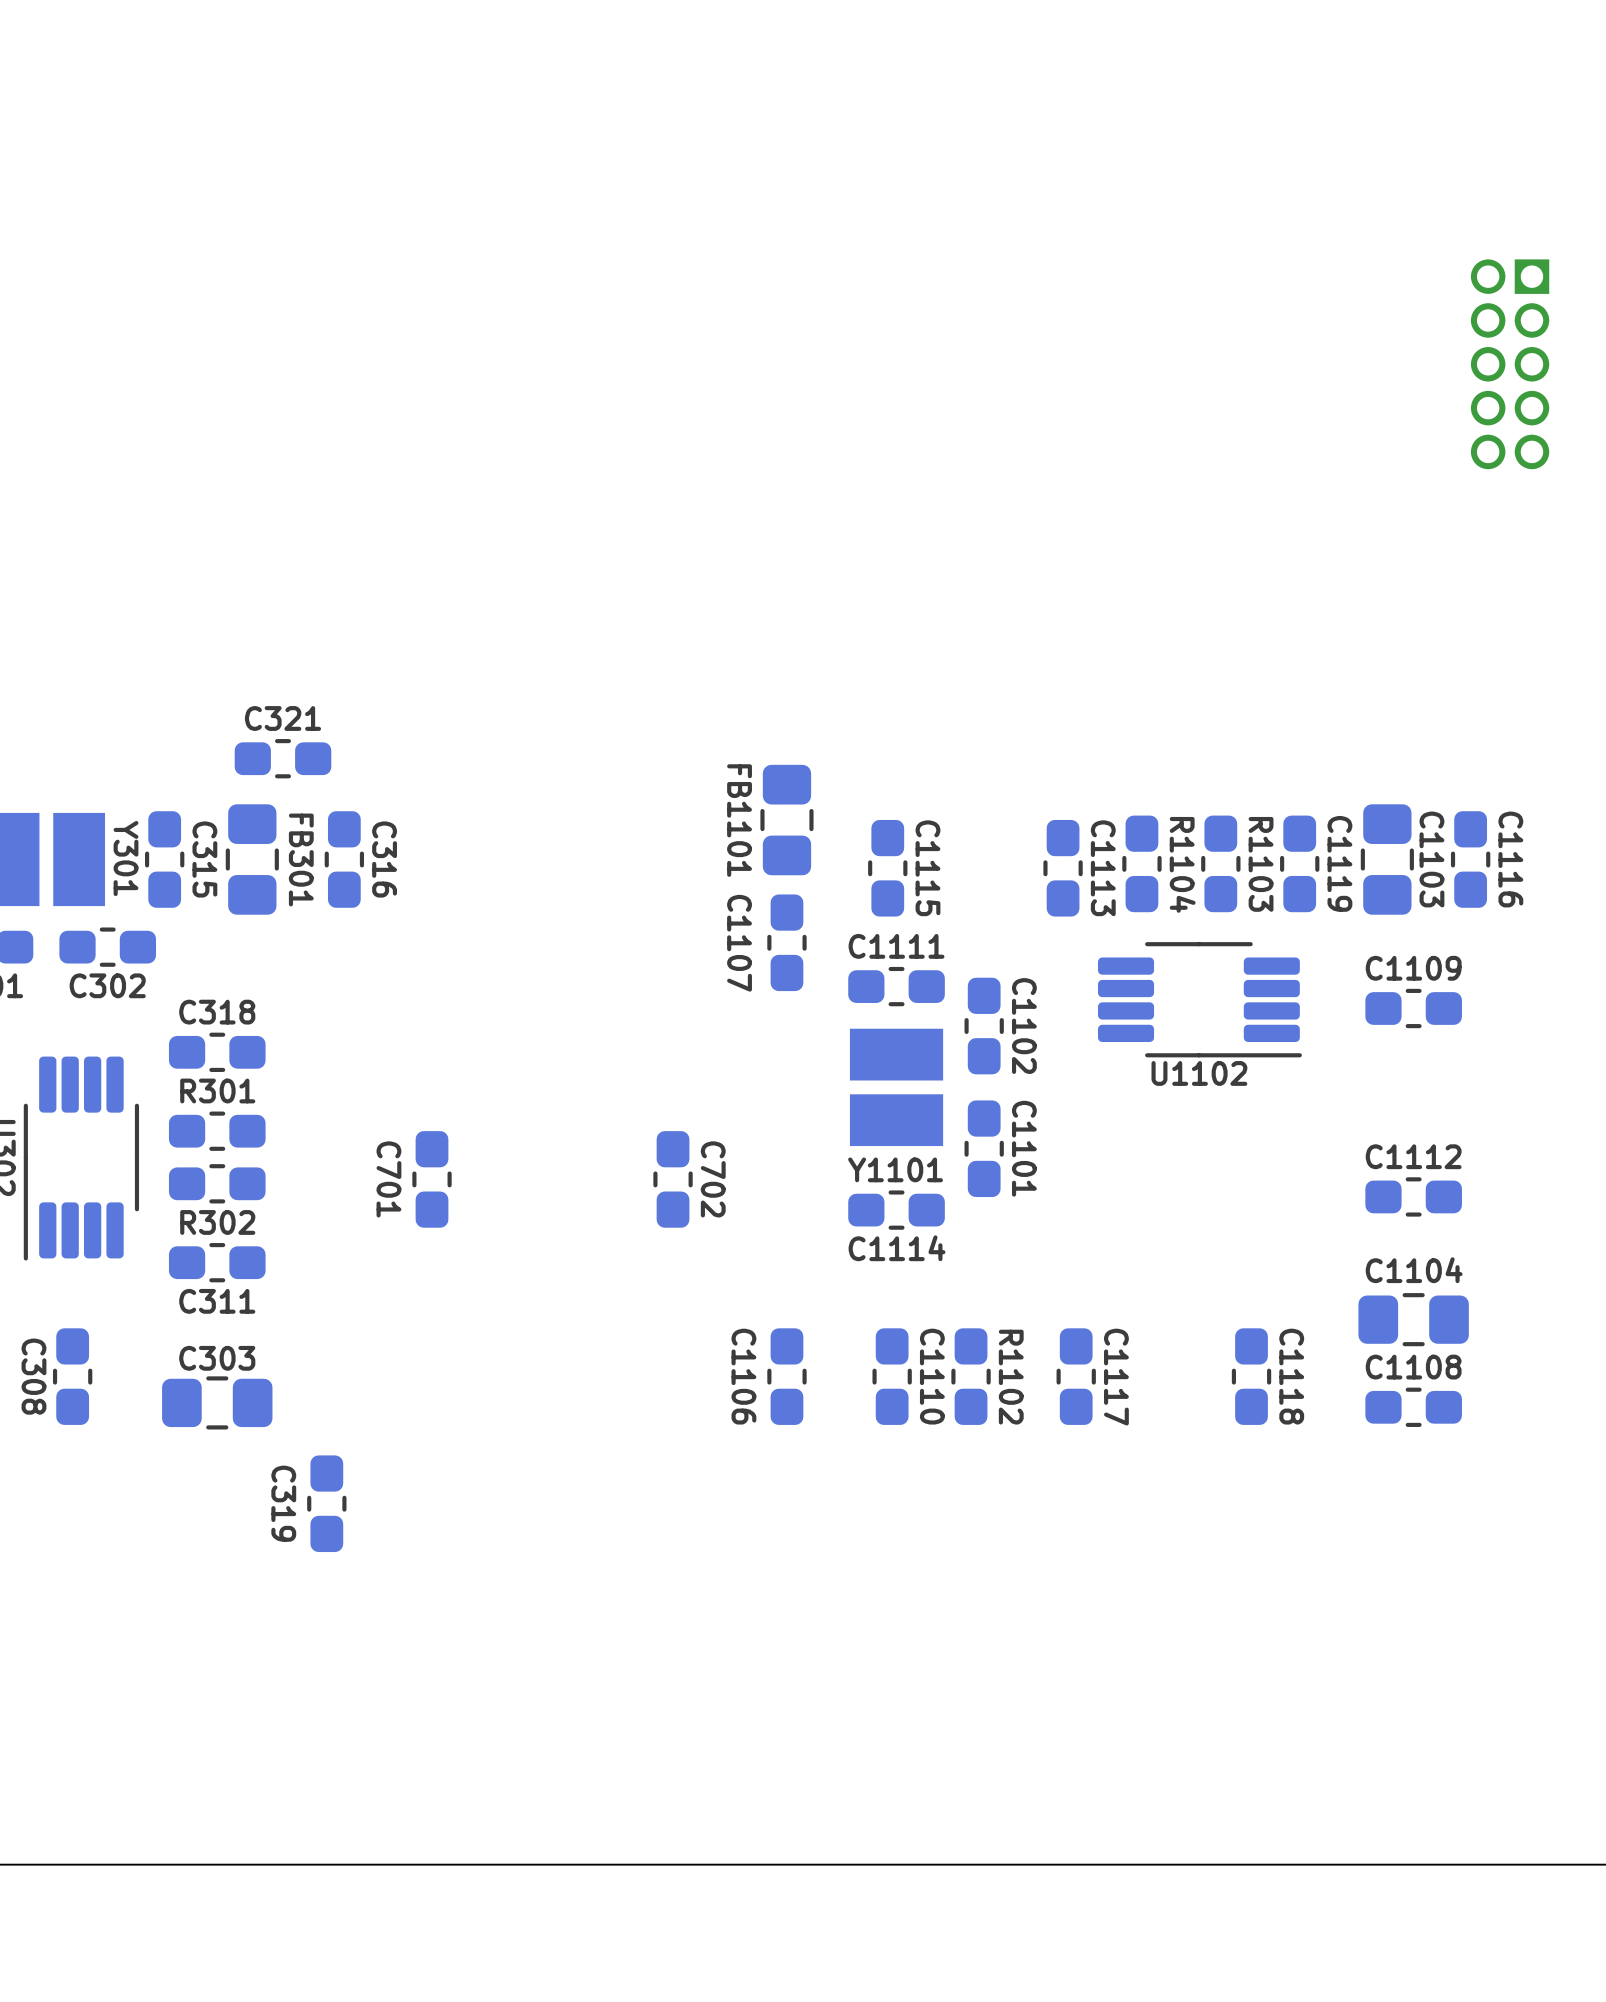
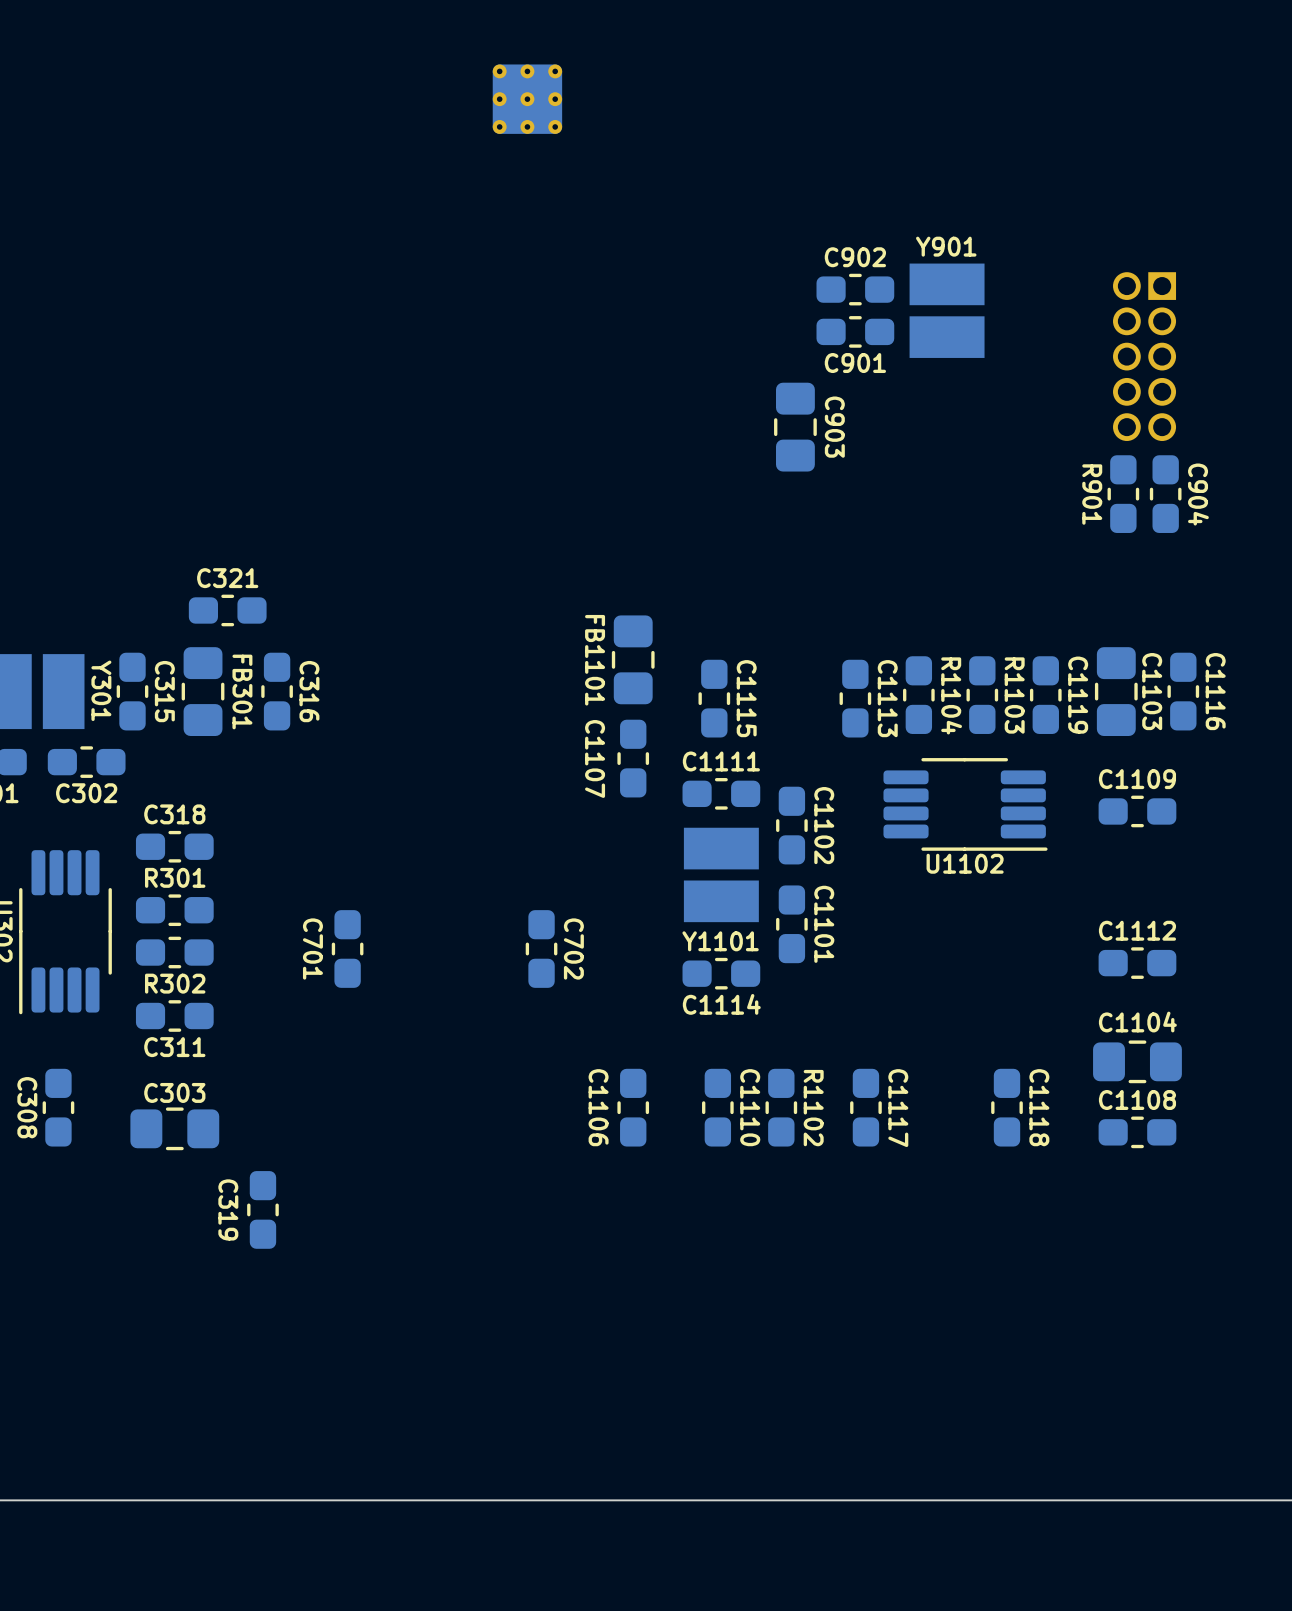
part: none -> (527, 99)
C902: none -> (855, 289)
part position: (1510, 364) -> (1144, 356)
Y901: none -> (947, 310)
C901: none -> (855, 331)
C903: none -> (795, 427)
R901: none -> (1123, 494)
C904: none -> (1165, 494)

